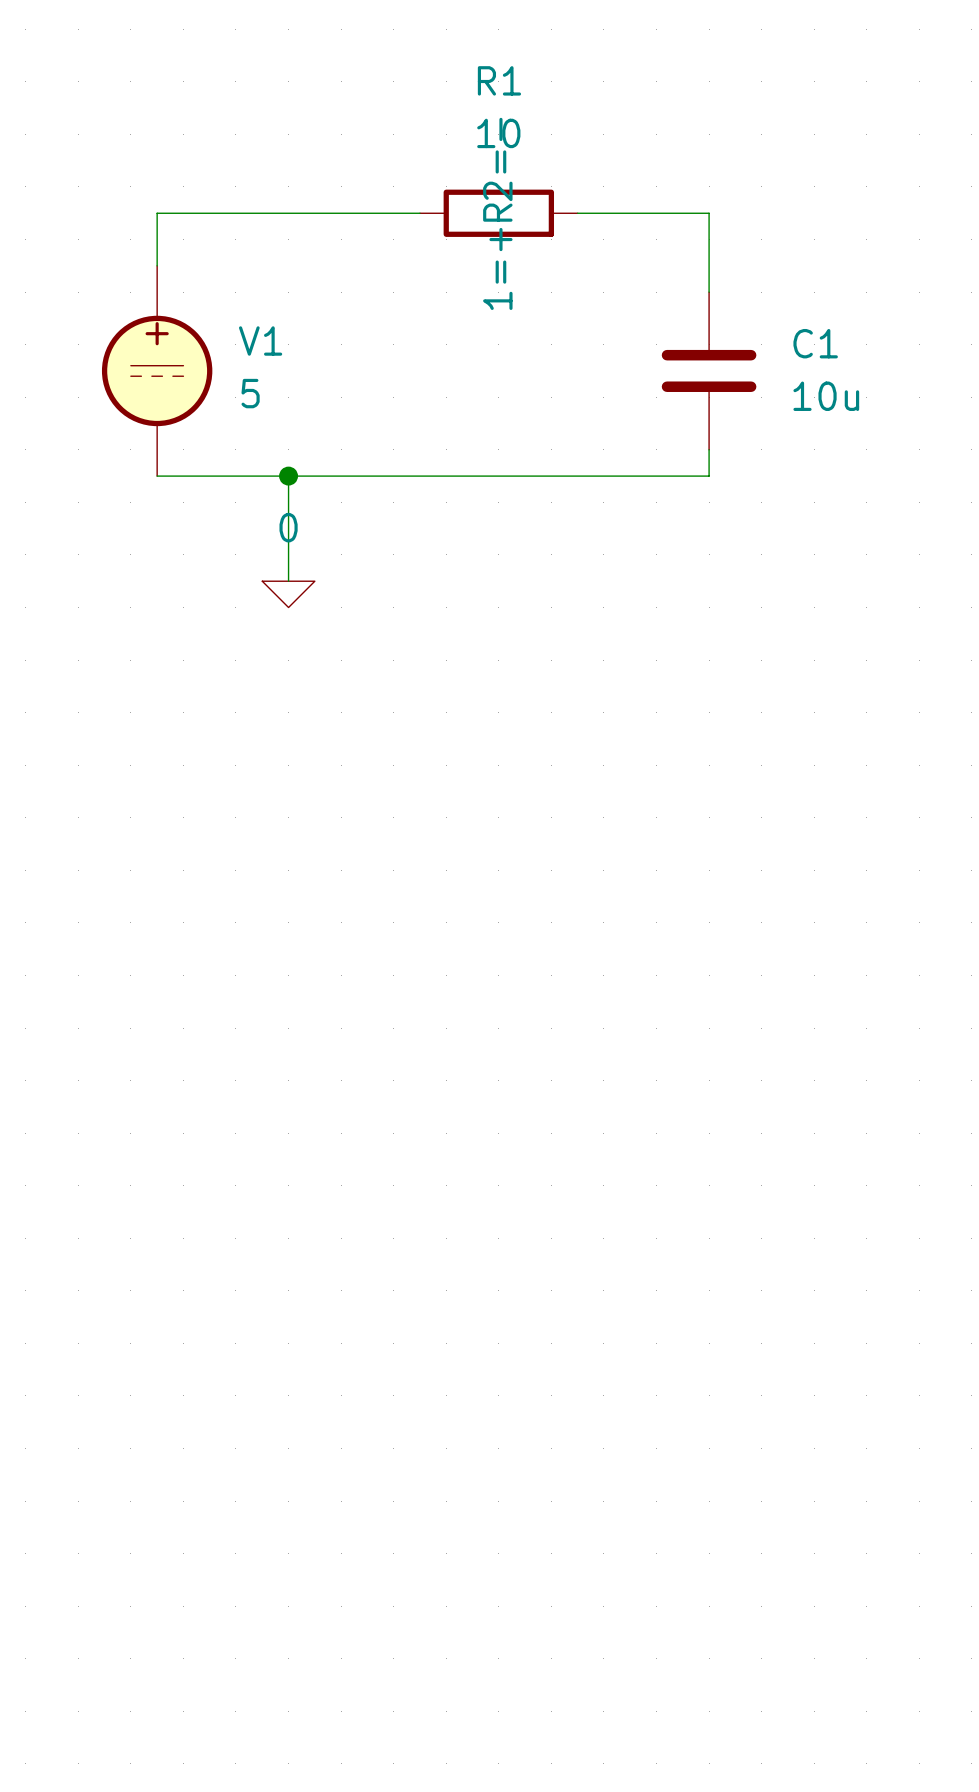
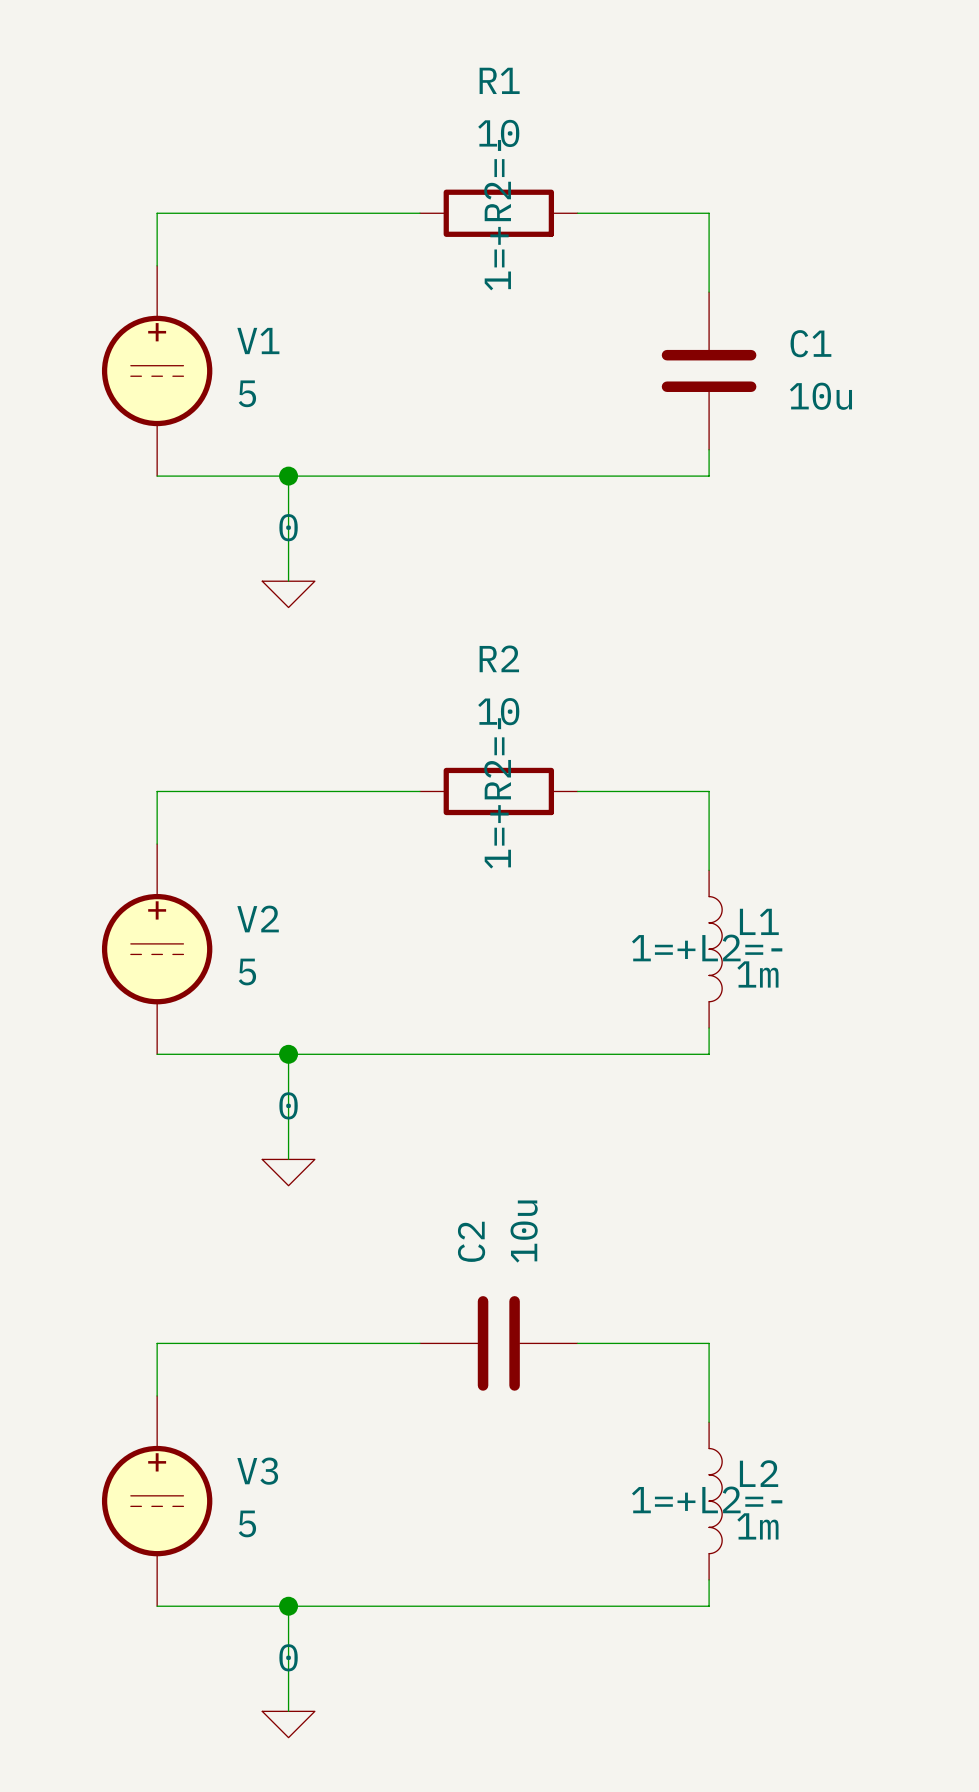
wire: none -> (419, 791) (157, 791) (157, 844)
R2: none -> 10 (498, 791)
wire: none -> (577, 791) (709, 791) (709, 870)
V2: none -> 5 (157, 949)
L1: none -> 1m (715, 949)
wire: none -> (709, 1028) (709, 1054) (157, 1054)
wire: none -> (288, 1054) (288, 1159)
junction: none -> (288, 1054)
power symbol: none -> 0 (288, 1172)
wire: none -> (419, 1343) (157, 1343) (157, 1395)
C2: none -> 10u (498, 1343)
wire: none -> (577, 1343) (709, 1343) (709, 1422)
V3: none -> 5 (157, 1501)
L2: none -> 1m (715, 1501)
wire: none -> (709, 1579) (709, 1606) (157, 1606)
wire: none -> (288, 1606) (288, 1711)
junction: none -> (288, 1606)
power symbol: none -> 0 (288, 1724)

